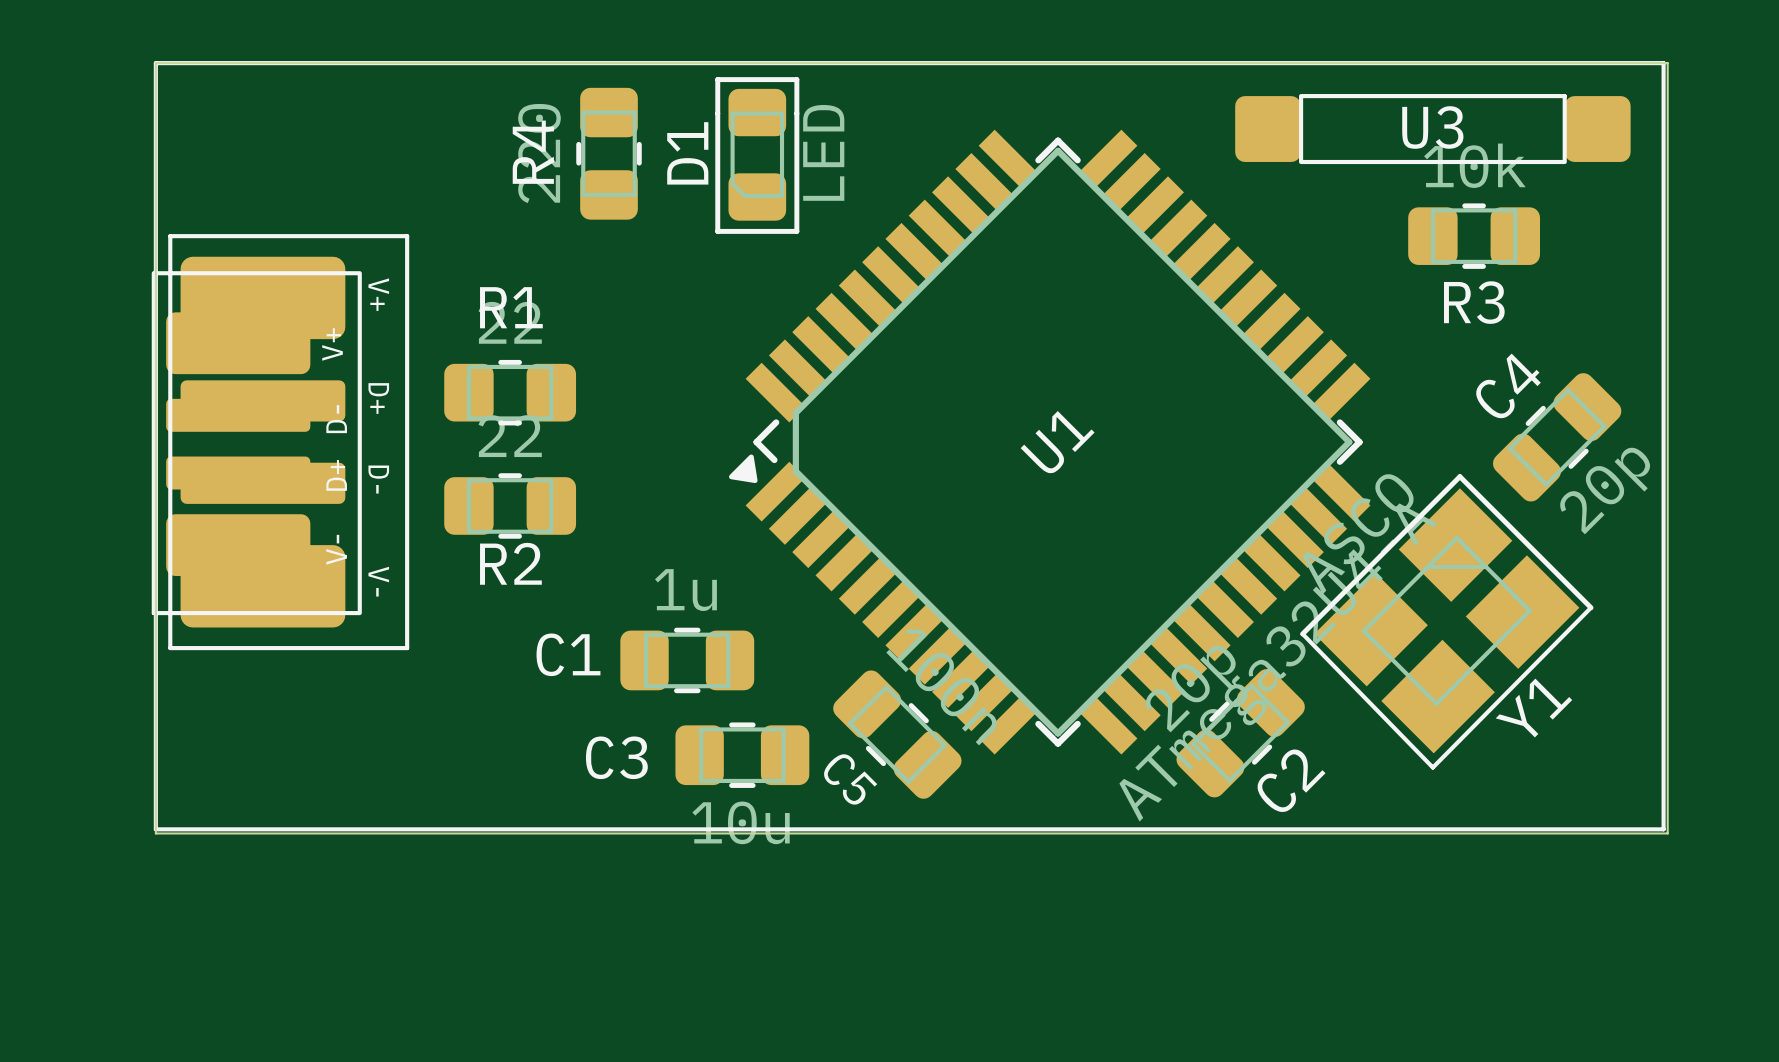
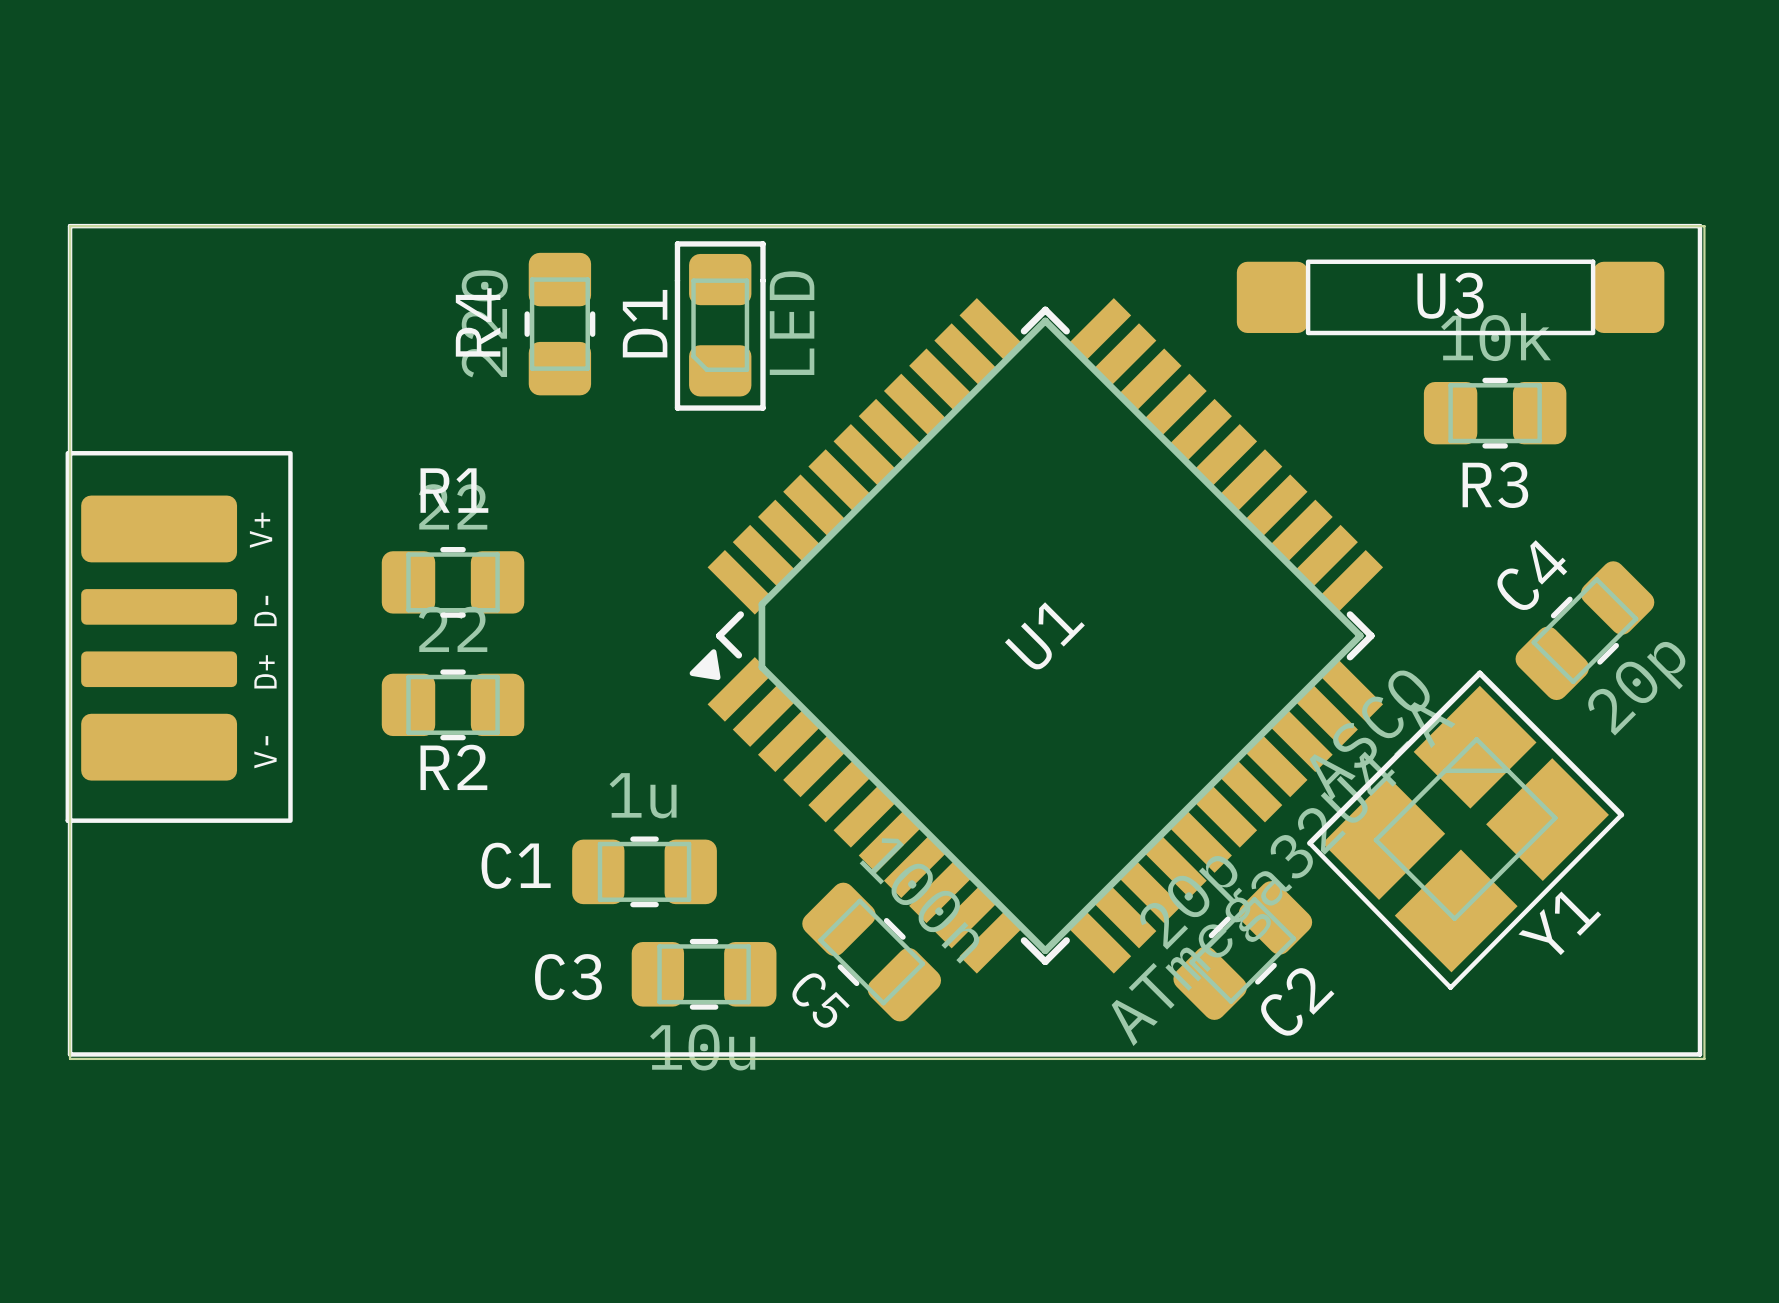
part: (288, 442) -> none

